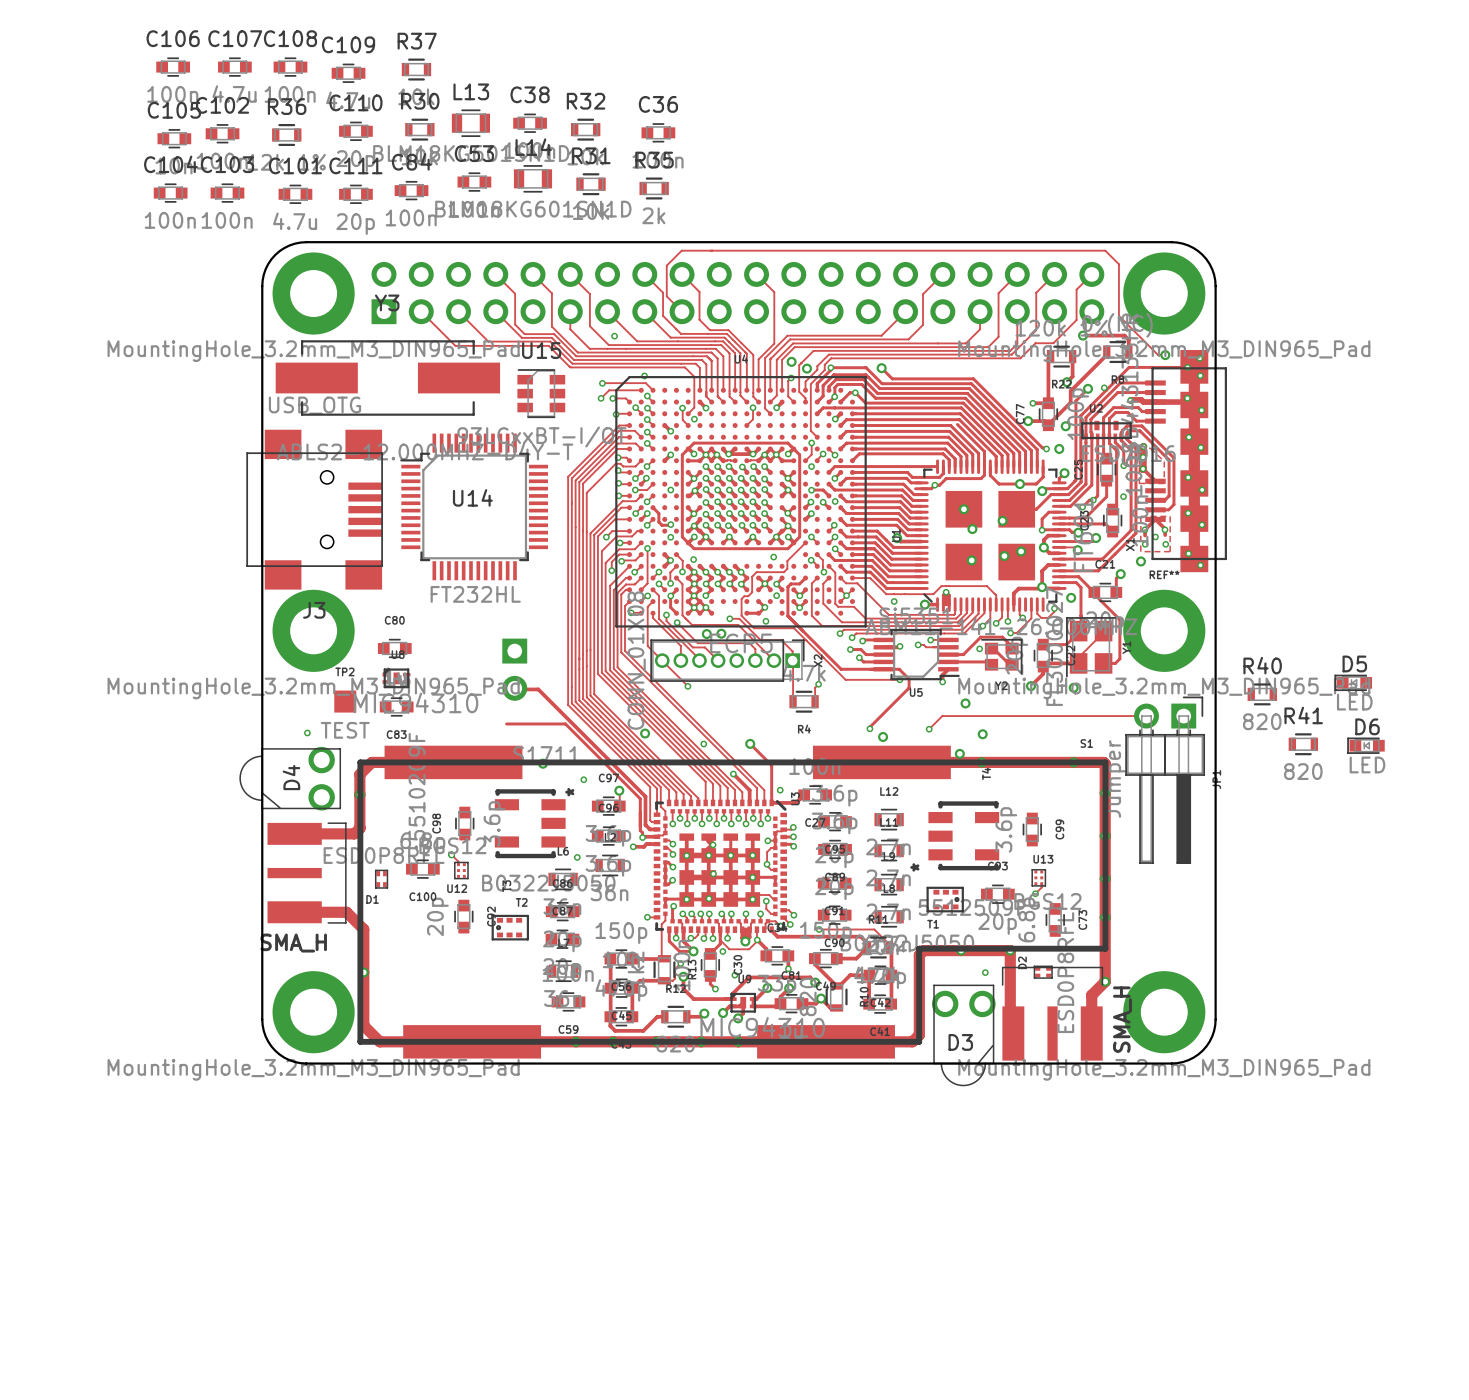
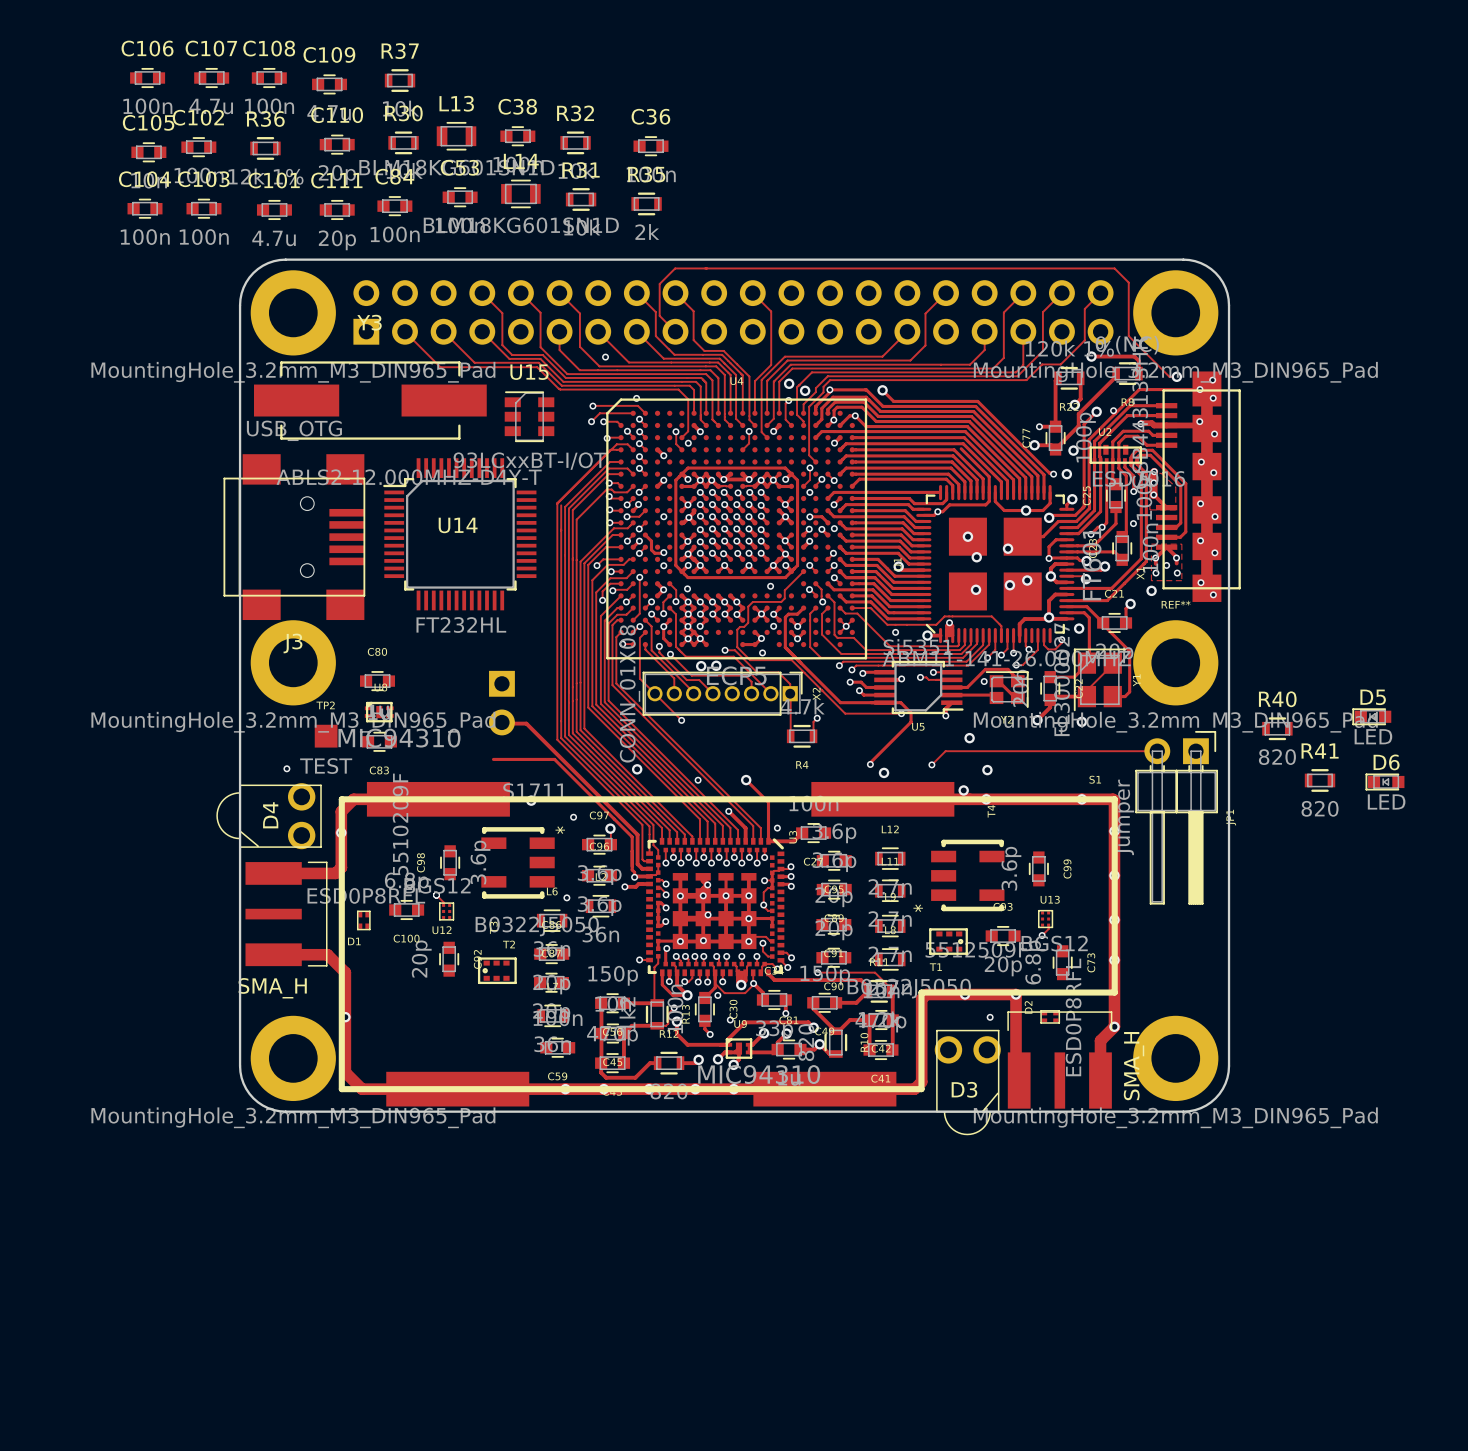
track: none -> (633, 449) (627, 444) (616, 444) (557, 503)
track: (641, 437) (634, 430) (619, 430) (571, 479) -> none

